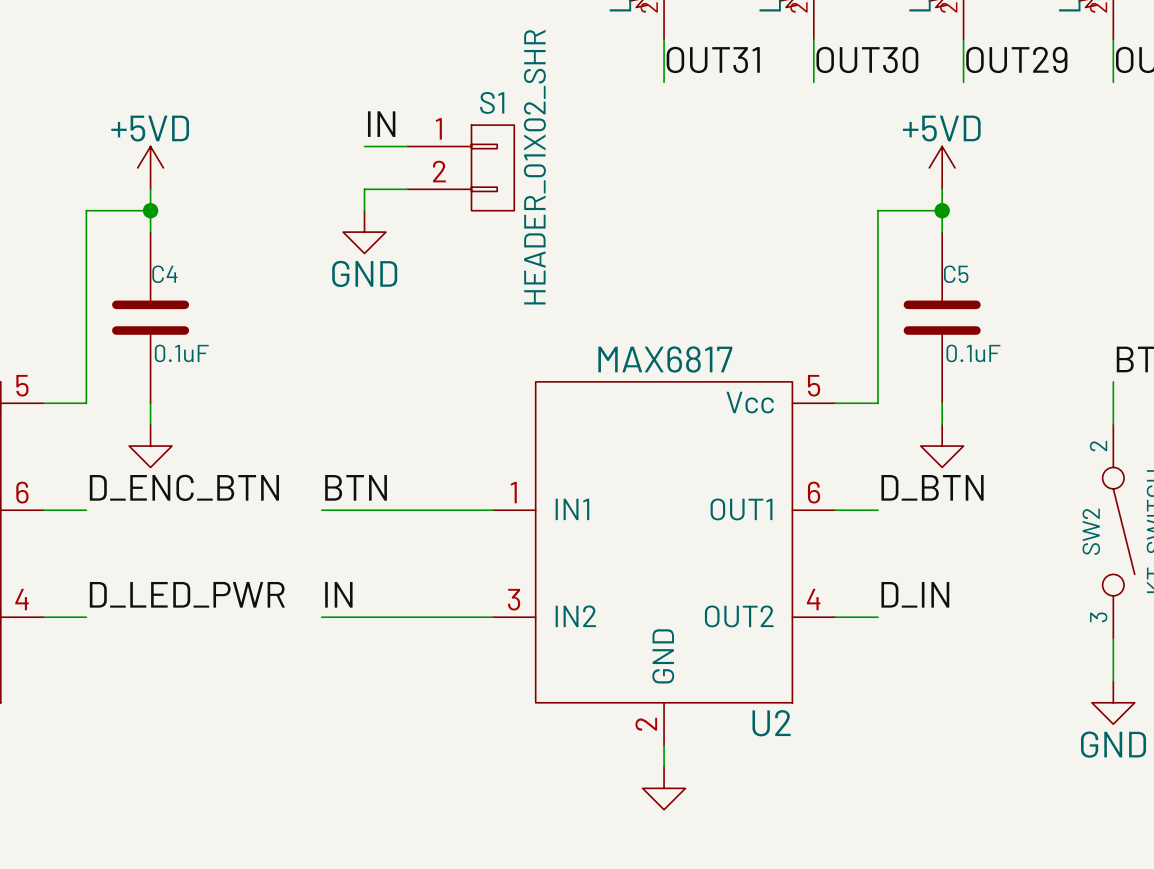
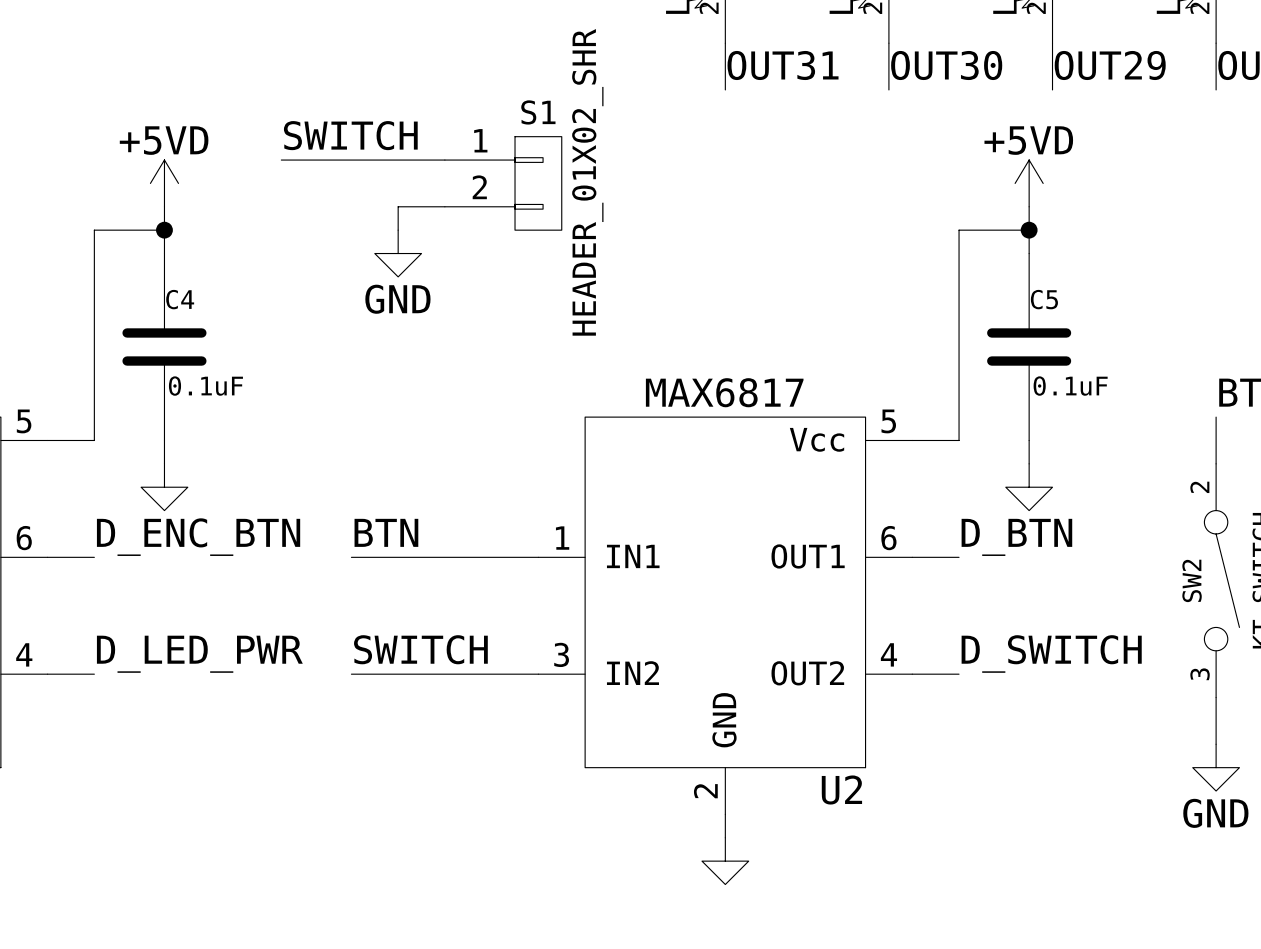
label: none -> SWITCH (350, 135)
label: IN (381, 124) -> none
wire: none -> (281, 160) (398, 160)
label: IN (338, 594) -> SWITCH (420, 649)
label: D_IN (915, 594) -> D_SWITCH (1051, 653)

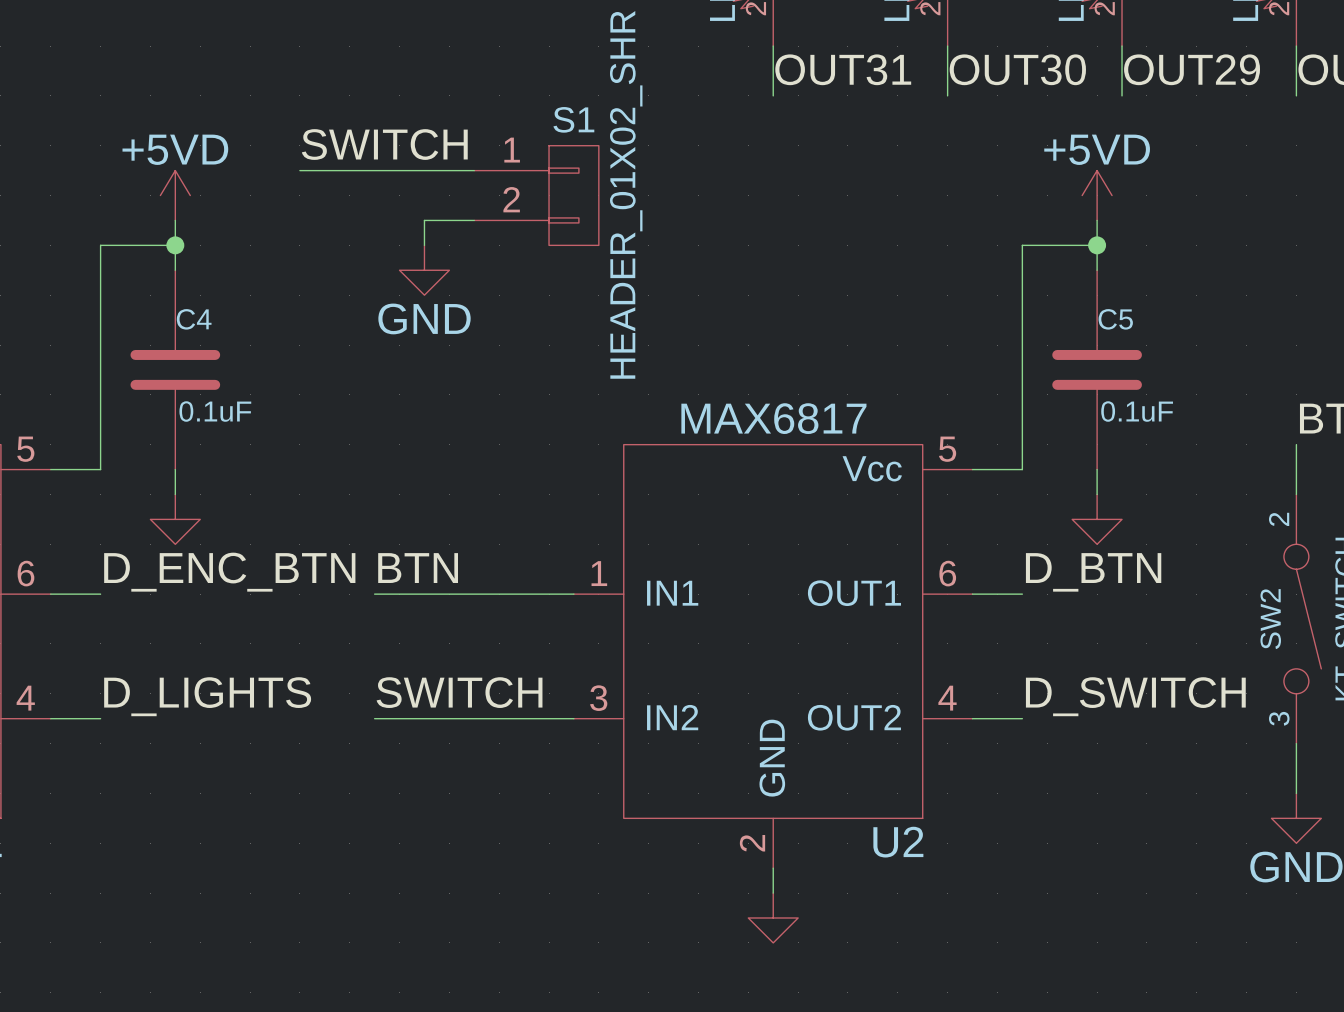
label: D_LED_PWR (199, 654) -> D_LIGHTS (207, 696)

